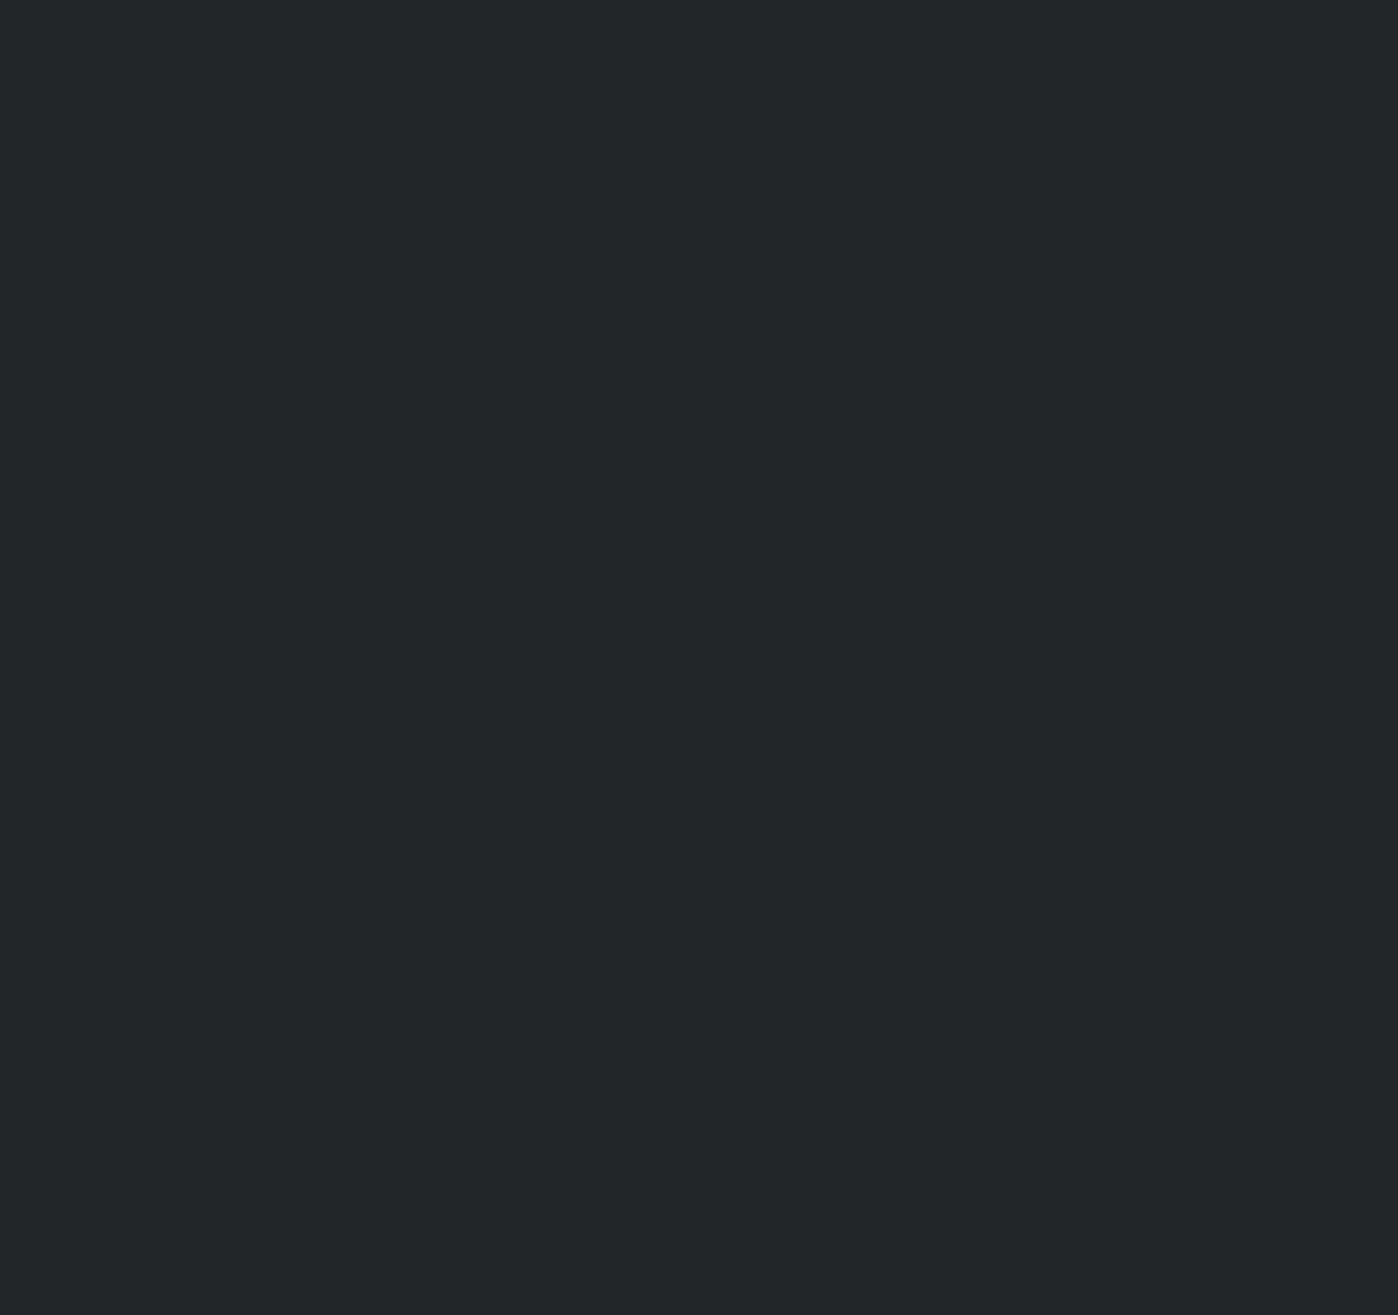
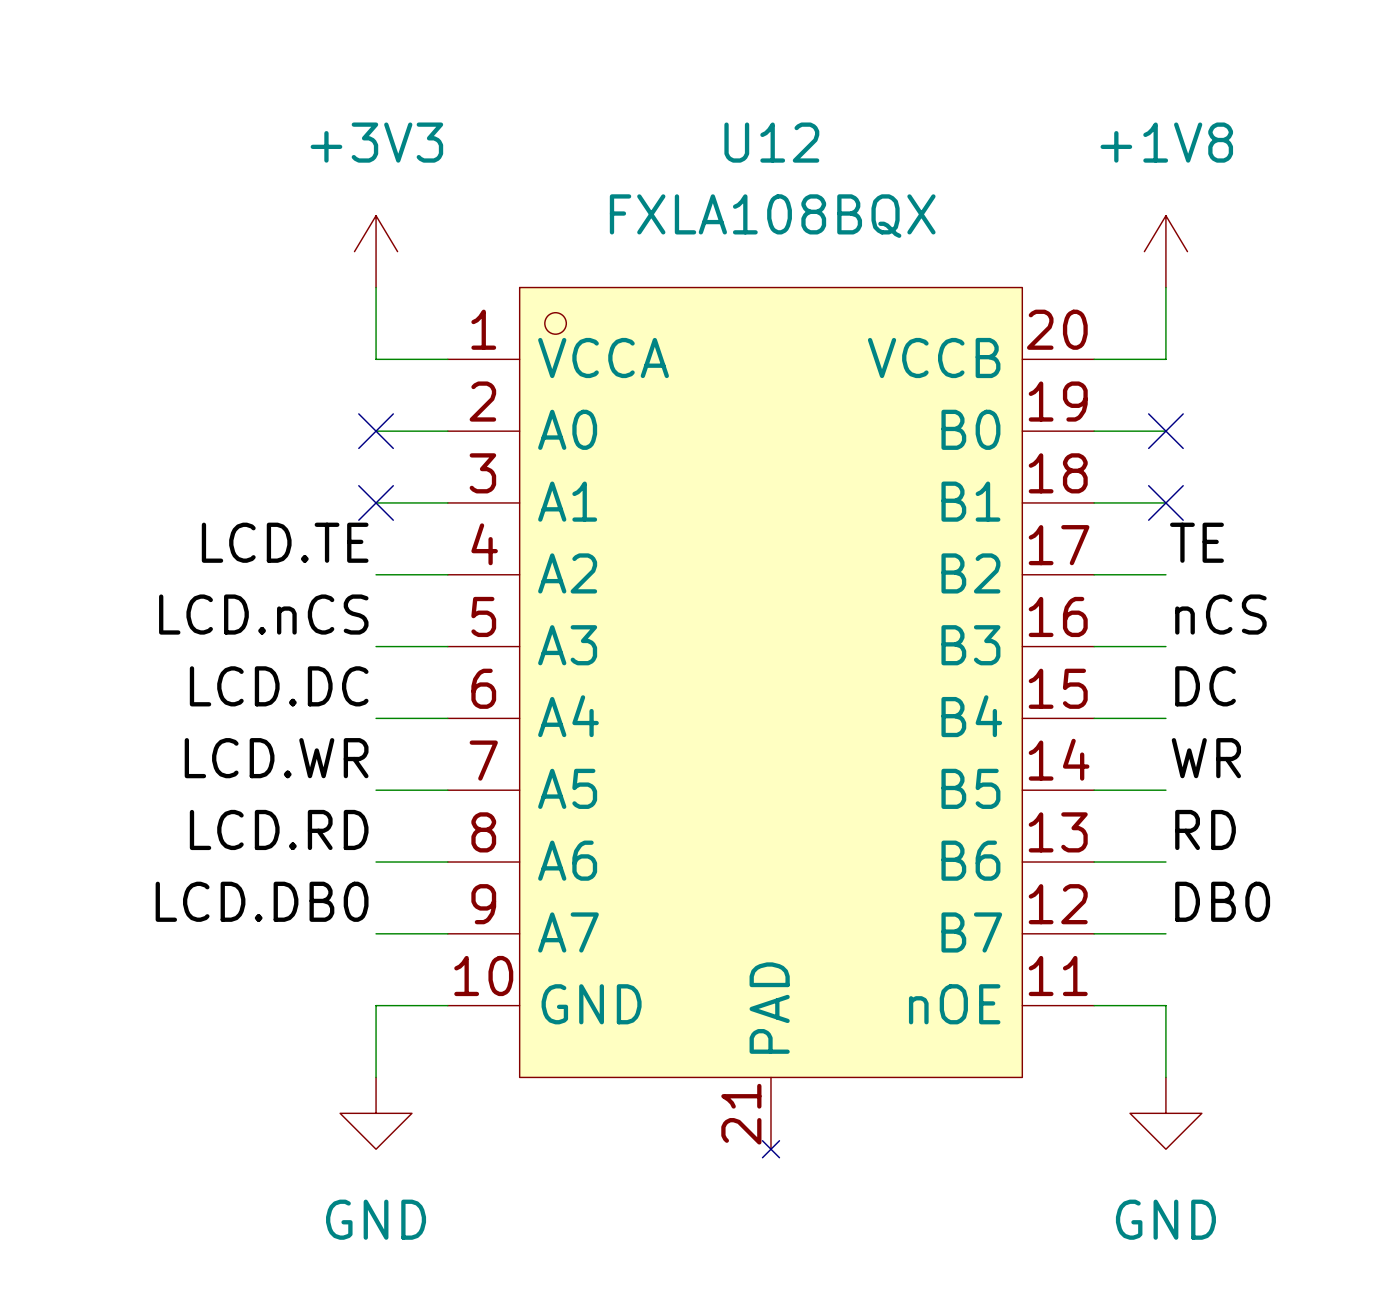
power symbol: none -> +3V3 (376, 251)
power symbol: none -> +1V8 (1165, 251)
wire: none -> (376, 287) (376, 359) (447, 359)
wire: none -> (1165, 287) (1165, 359) (1094, 359)
wire: none -> (376, 431) (447, 431)
no-connect mark: none -> (376, 431)
wire: none -> (1094, 431) (1165, 431)
no-connect mark: none -> (1165, 431)
wire: none -> (376, 502) (447, 502)
no-connect mark: none -> (376, 502)
wire: none -> (1094, 502) (1165, 502)
no-connect mark: none -> (1165, 502)
label: none -> LCD.TE (285, 542)
label: none -> TE (1196, 542)
wire: none -> (376, 574) (447, 574)
wire: none -> (1094, 574) (1165, 574)
label: none -> LCD.nCS (263, 614)
label: none -> nCS (1220, 614)
wire: none -> (376, 646) (447, 646)
wire: none -> (1094, 646) (1165, 646)
label: none -> LCD.DC (279, 686)
label: none -> DC (1205, 686)
wire: none -> (376, 718) (447, 718)
wire: none -> (1094, 718) (1165, 718)
U12: none -> FXLA108BQX (770, 722)
label: none -> LCD.WR (276, 758)
label: none -> WR (1206, 758)
wire: none -> (376, 790) (447, 790)
wire: none -> (1094, 790) (1165, 790)
label: none -> LCD.RD (279, 829)
label: none -> RD (1205, 829)
wire: none -> (376, 862) (447, 862)
wire: none -> (1094, 862) (1165, 862)
label: none -> LCD.DB0 (262, 901)
label: none -> DB0 (1222, 901)
wire: none -> (376, 933) (447, 933)
wire: none -> (1094, 933) (1165, 933)
wire: none -> (447, 1005) (376, 1005) (376, 1077)
wire: none -> (1094, 1005) (1165, 1005) (1165, 1077)
power symbol: none -> GND (376, 1113)
power symbol: none -> GND (1165, 1113)

